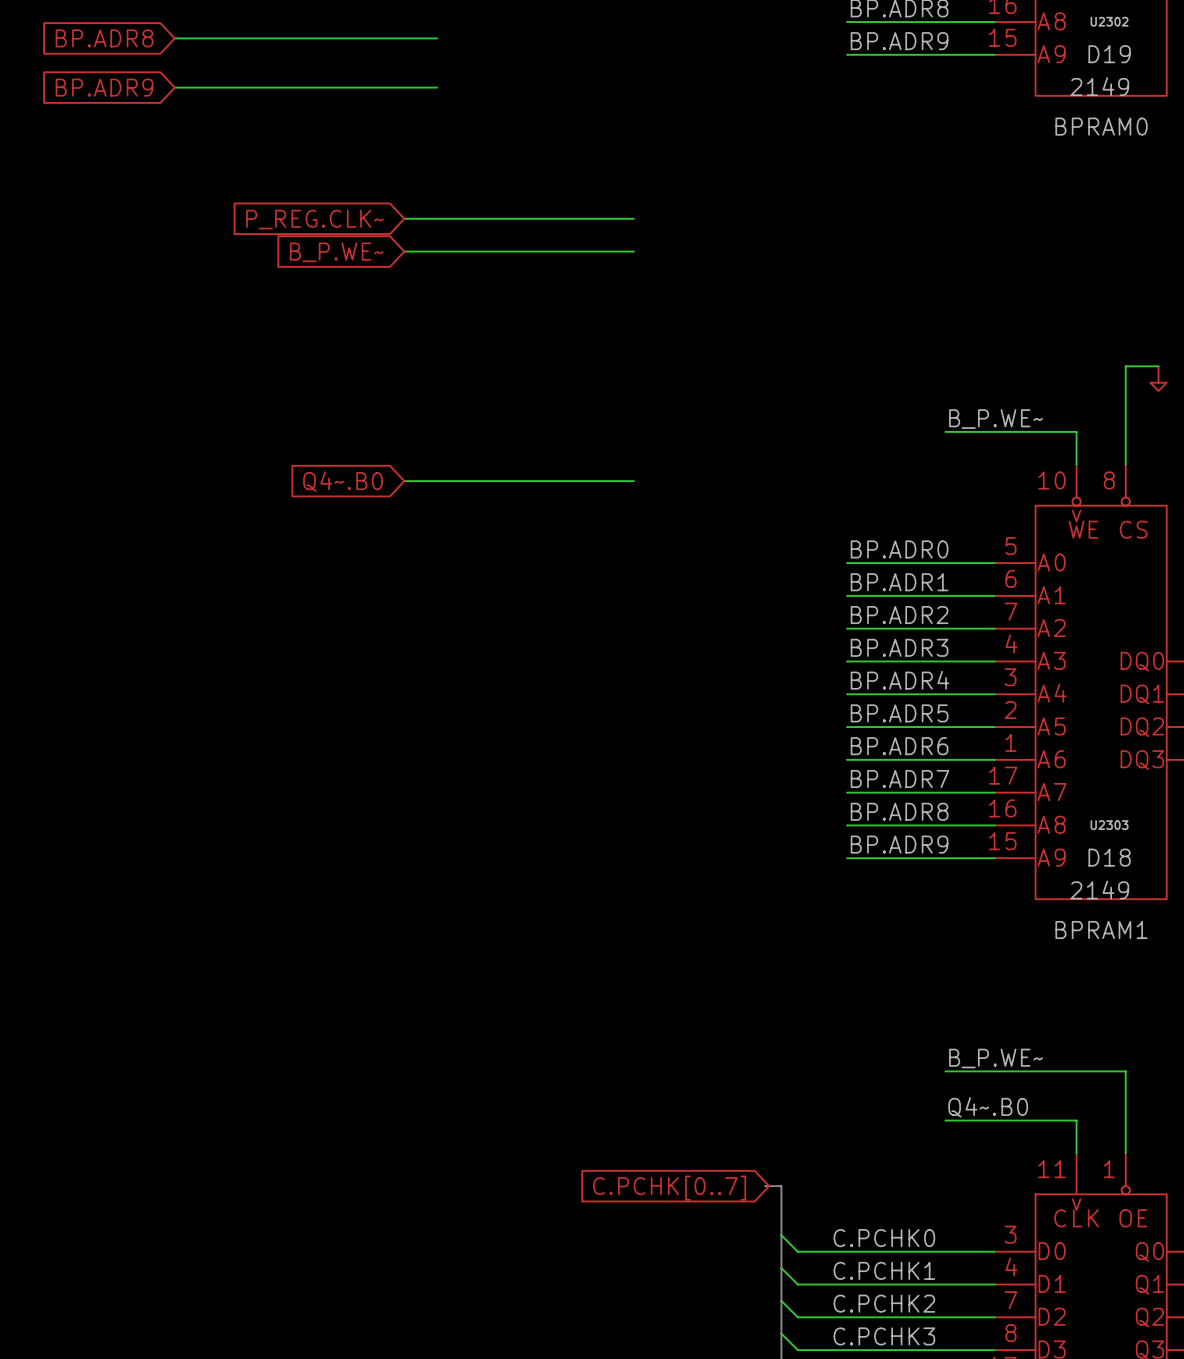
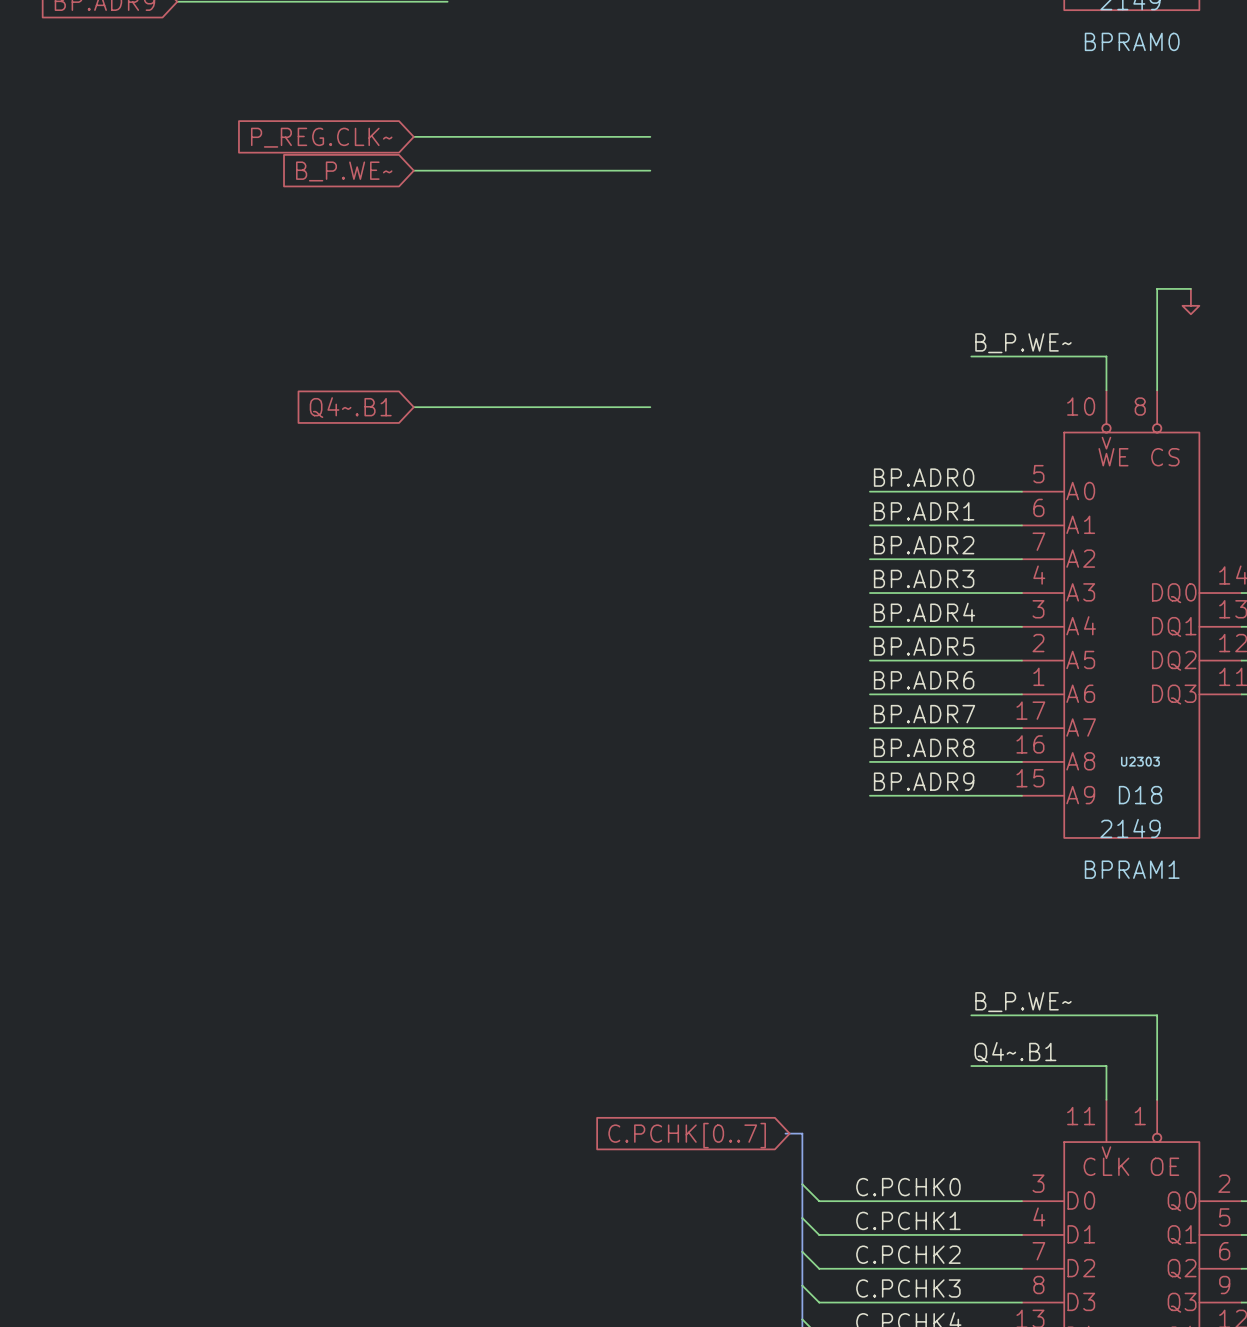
global label: Q4~.B0 (343, 481) -> Q4~.B1 (350, 407)
label: Q4~.B0 (988, 1107) -> Q4~.B1 (1015, 1052)

